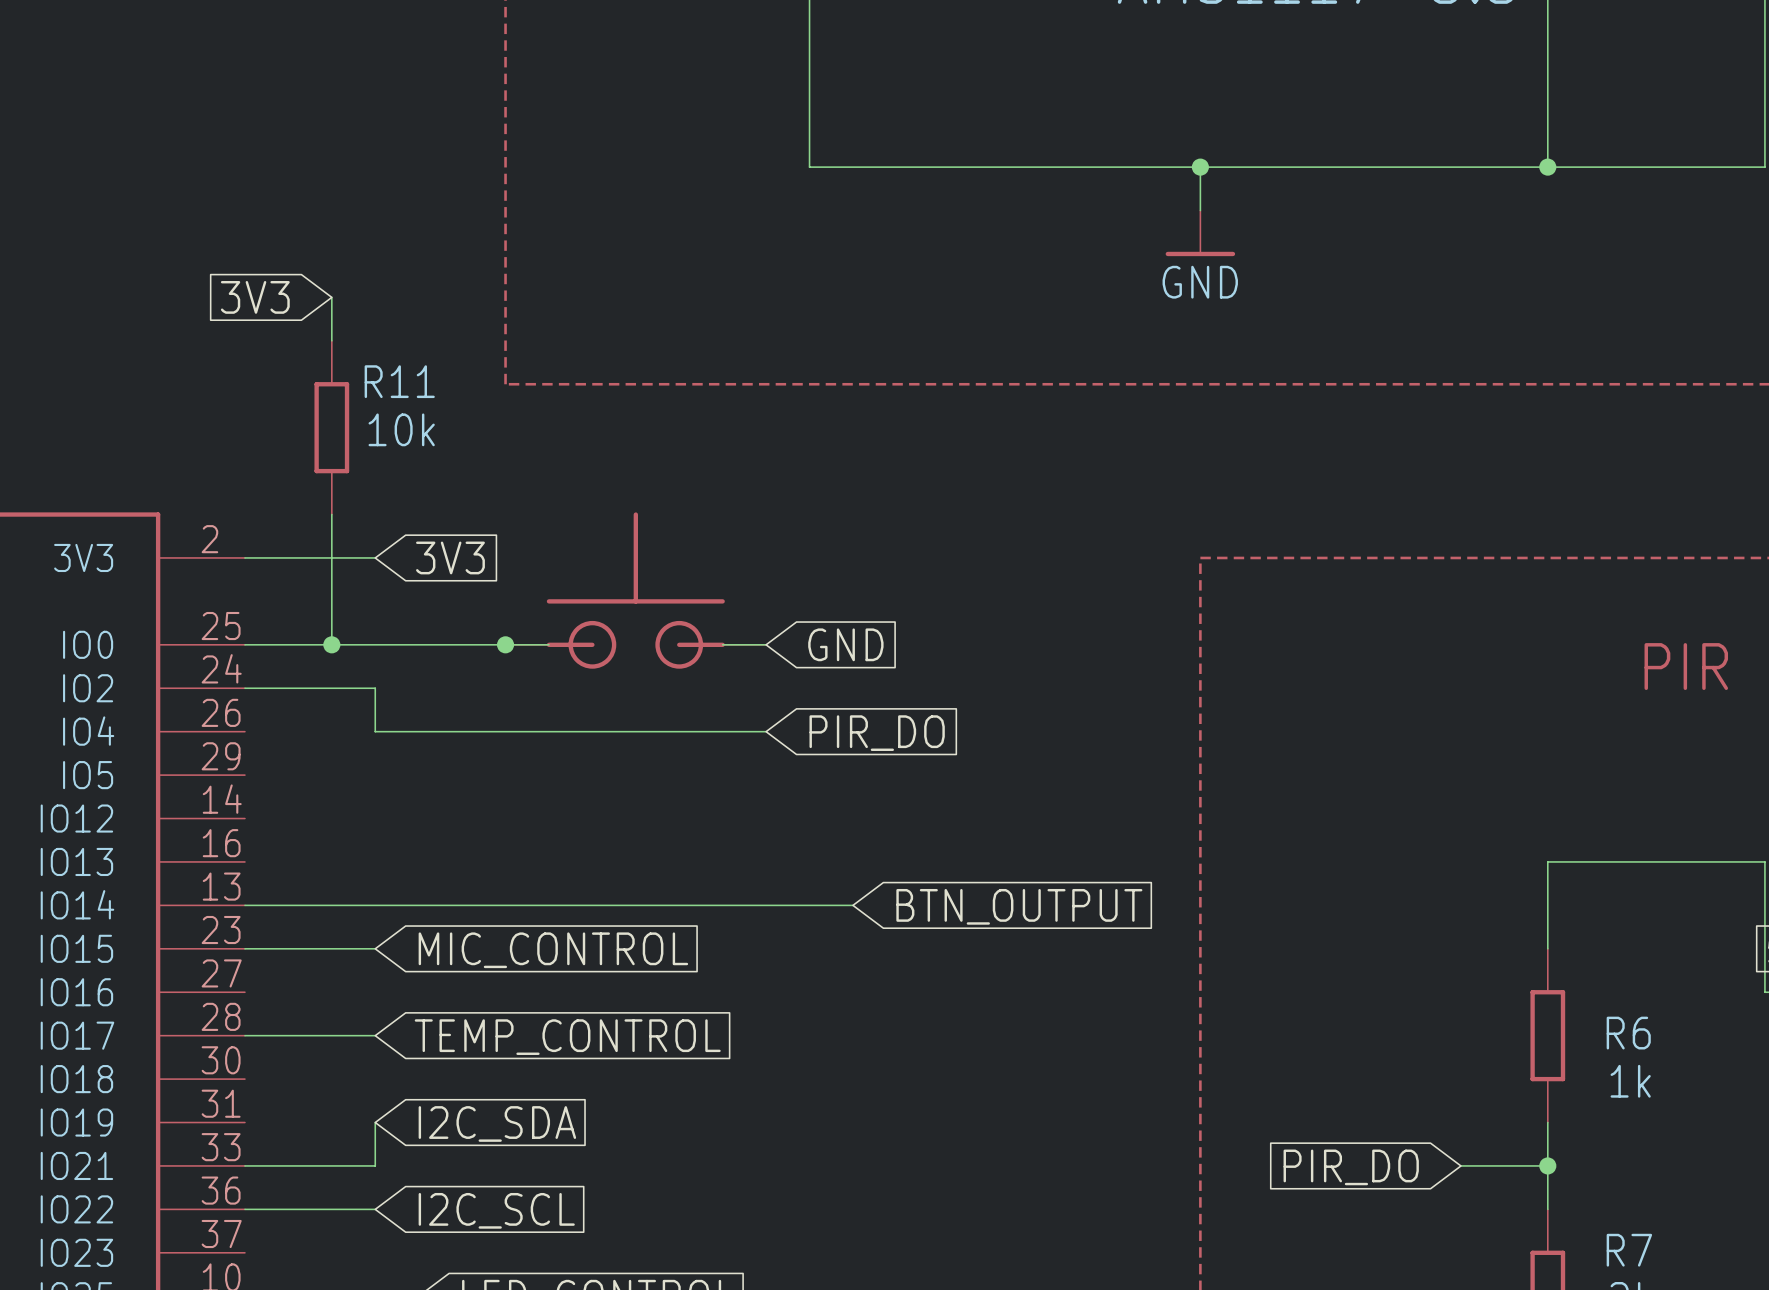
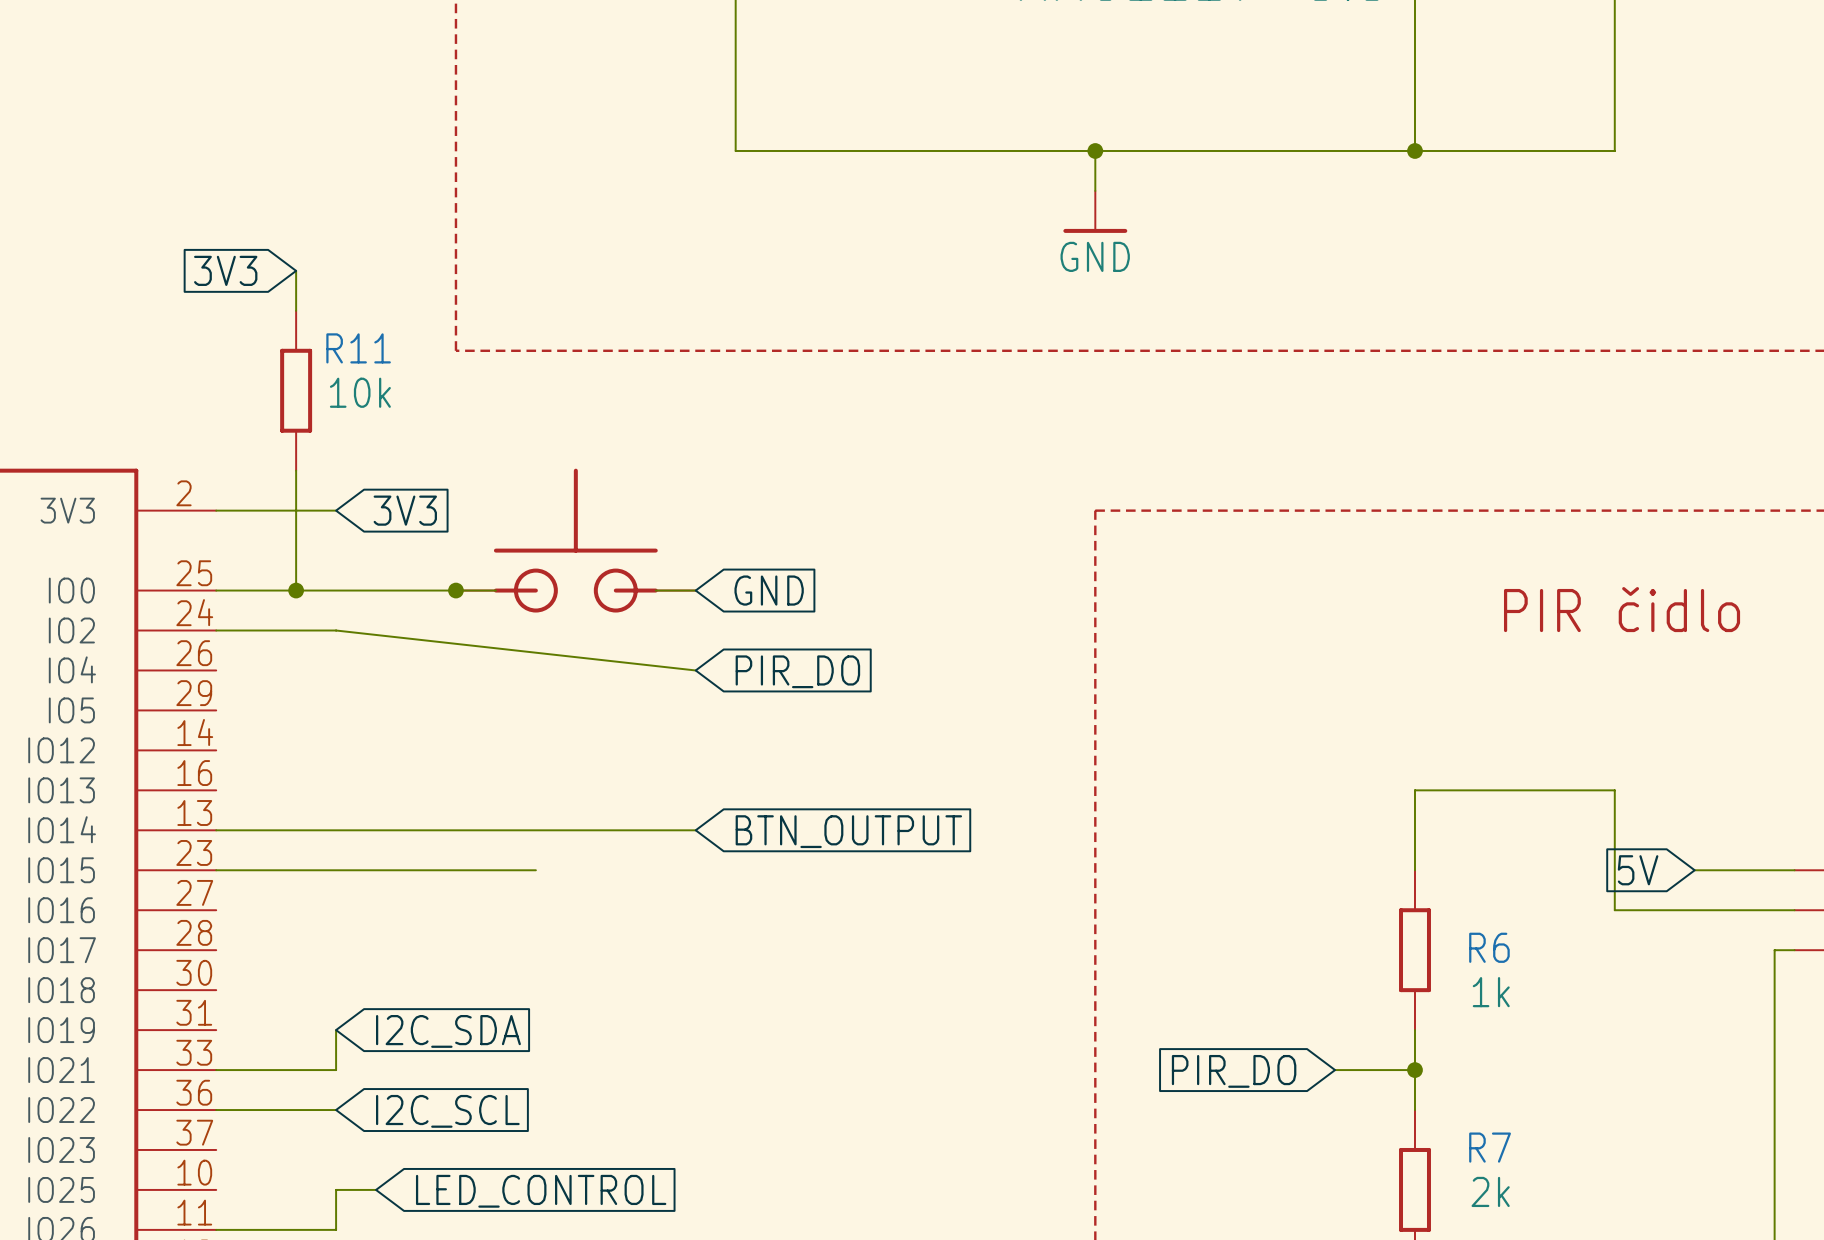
wire: (375, 688) (375, 731) (766, 731) -> (336, 630) (695, 670)
wire: (766, 905) (852, 905) -> none
global label position: BTN_OUTPUT (1019, 906) -> BTN_OUTPUT (848, 831)
wire: none -> (336, 870) (535, 870)
global label: MIC_CONTROL (553, 950) -> none
wire: (244, 1035) (375, 1035) -> none
global label: TEMP_CONTROL (567, 1037) -> none

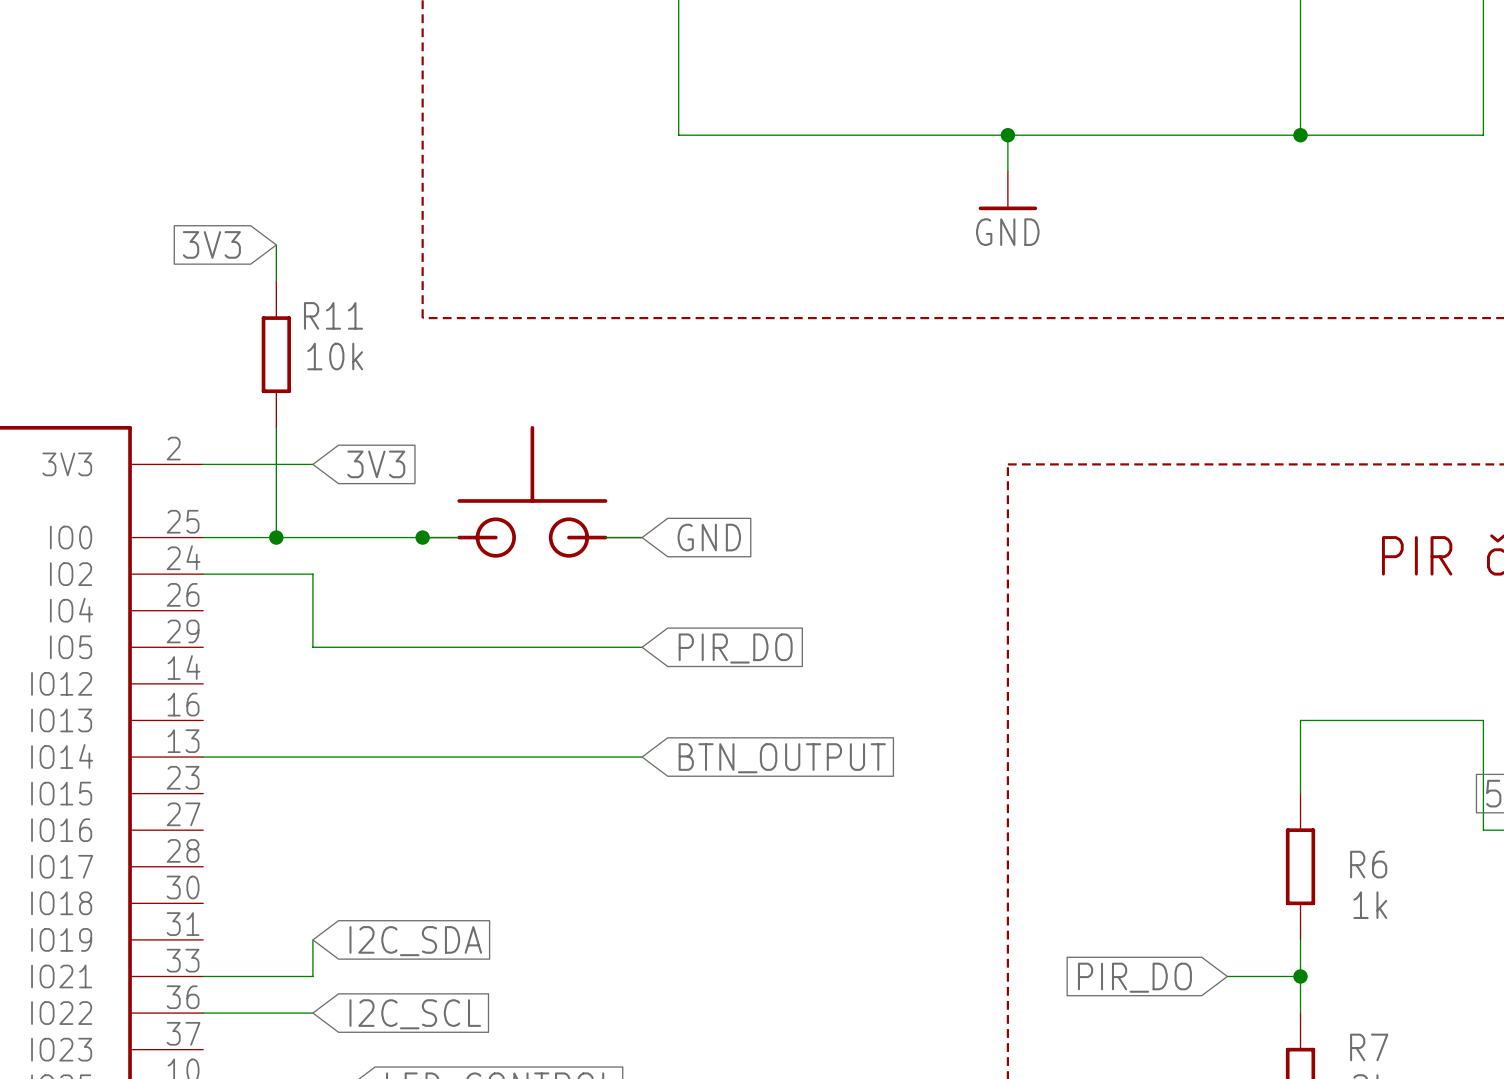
wire: (336, 630) (695, 670) -> (312, 574) (312, 647) (642, 647)
global label position: PIR_DO (797, 671) -> PIR_DO (735, 648)
wire: (216, 870) (535, 870) -> none

